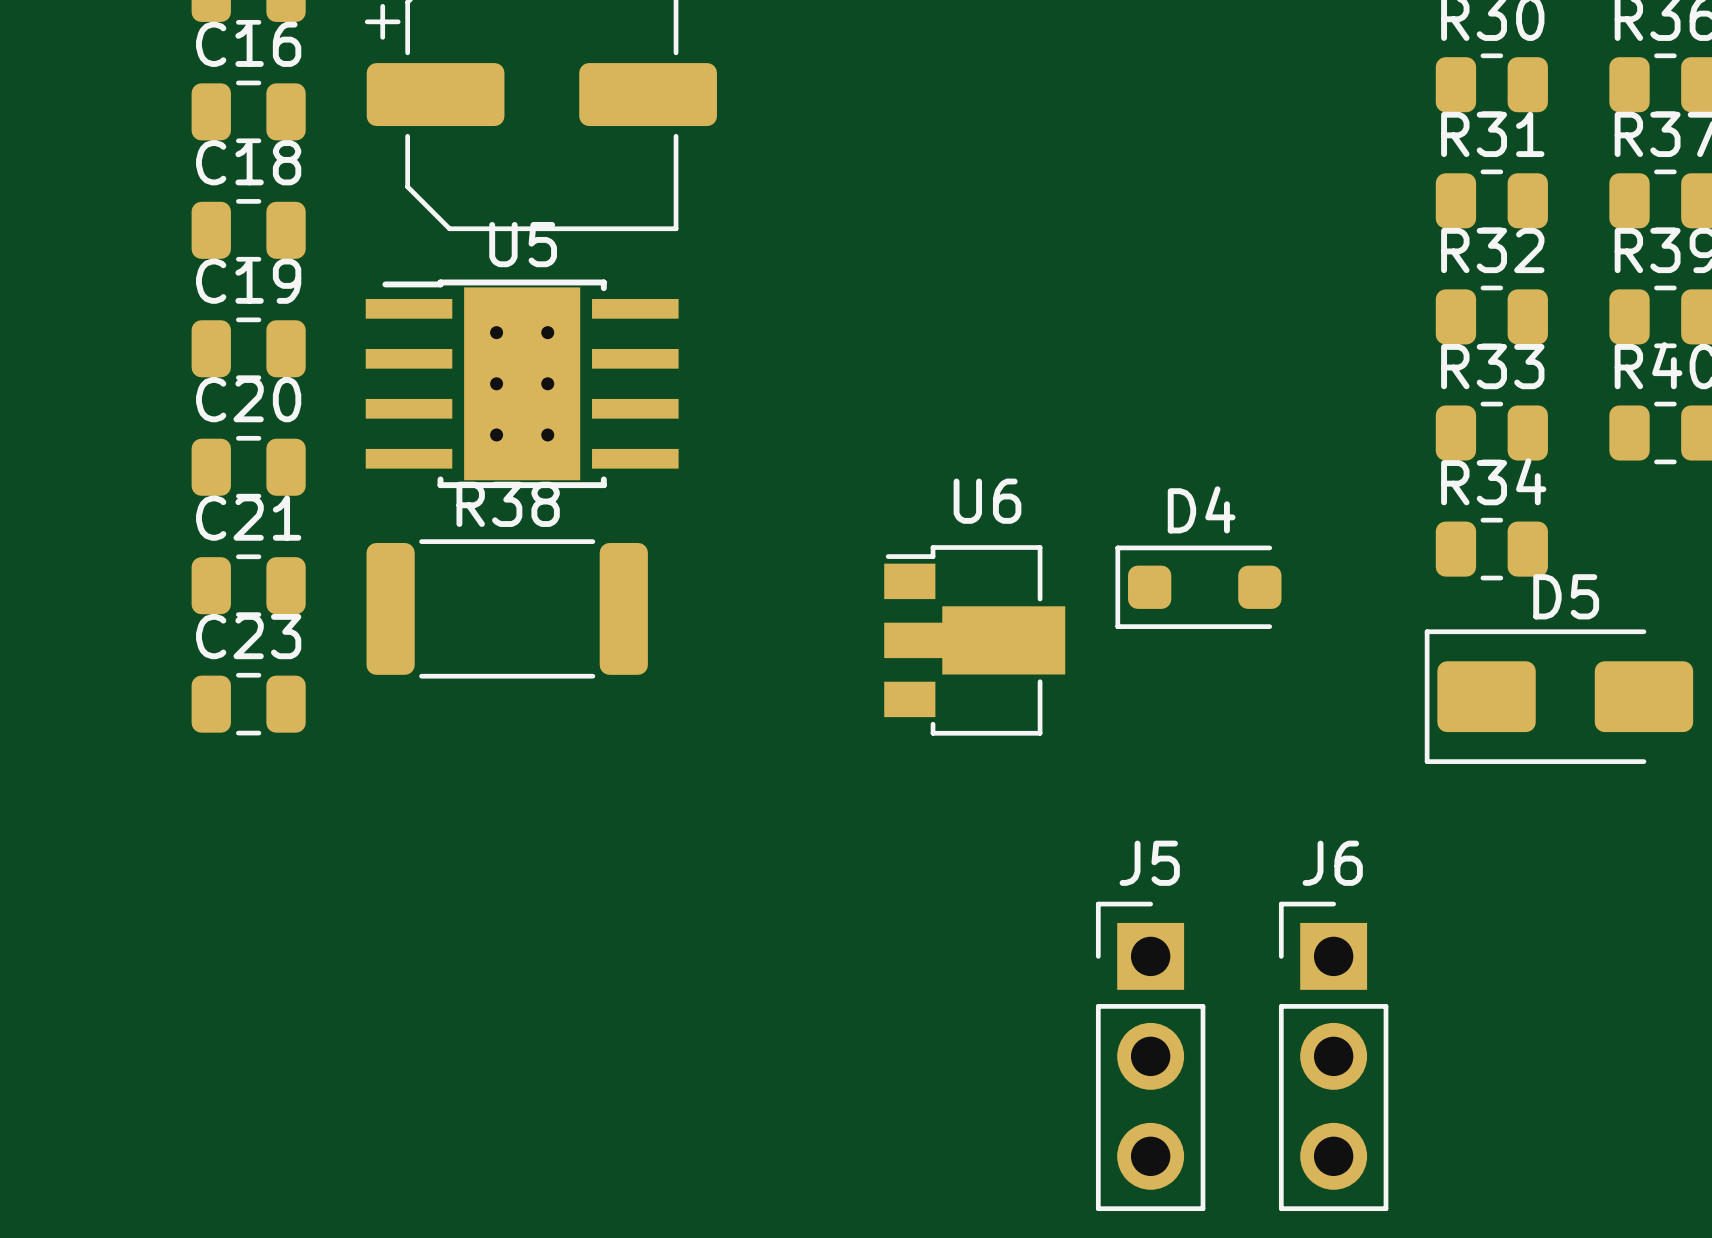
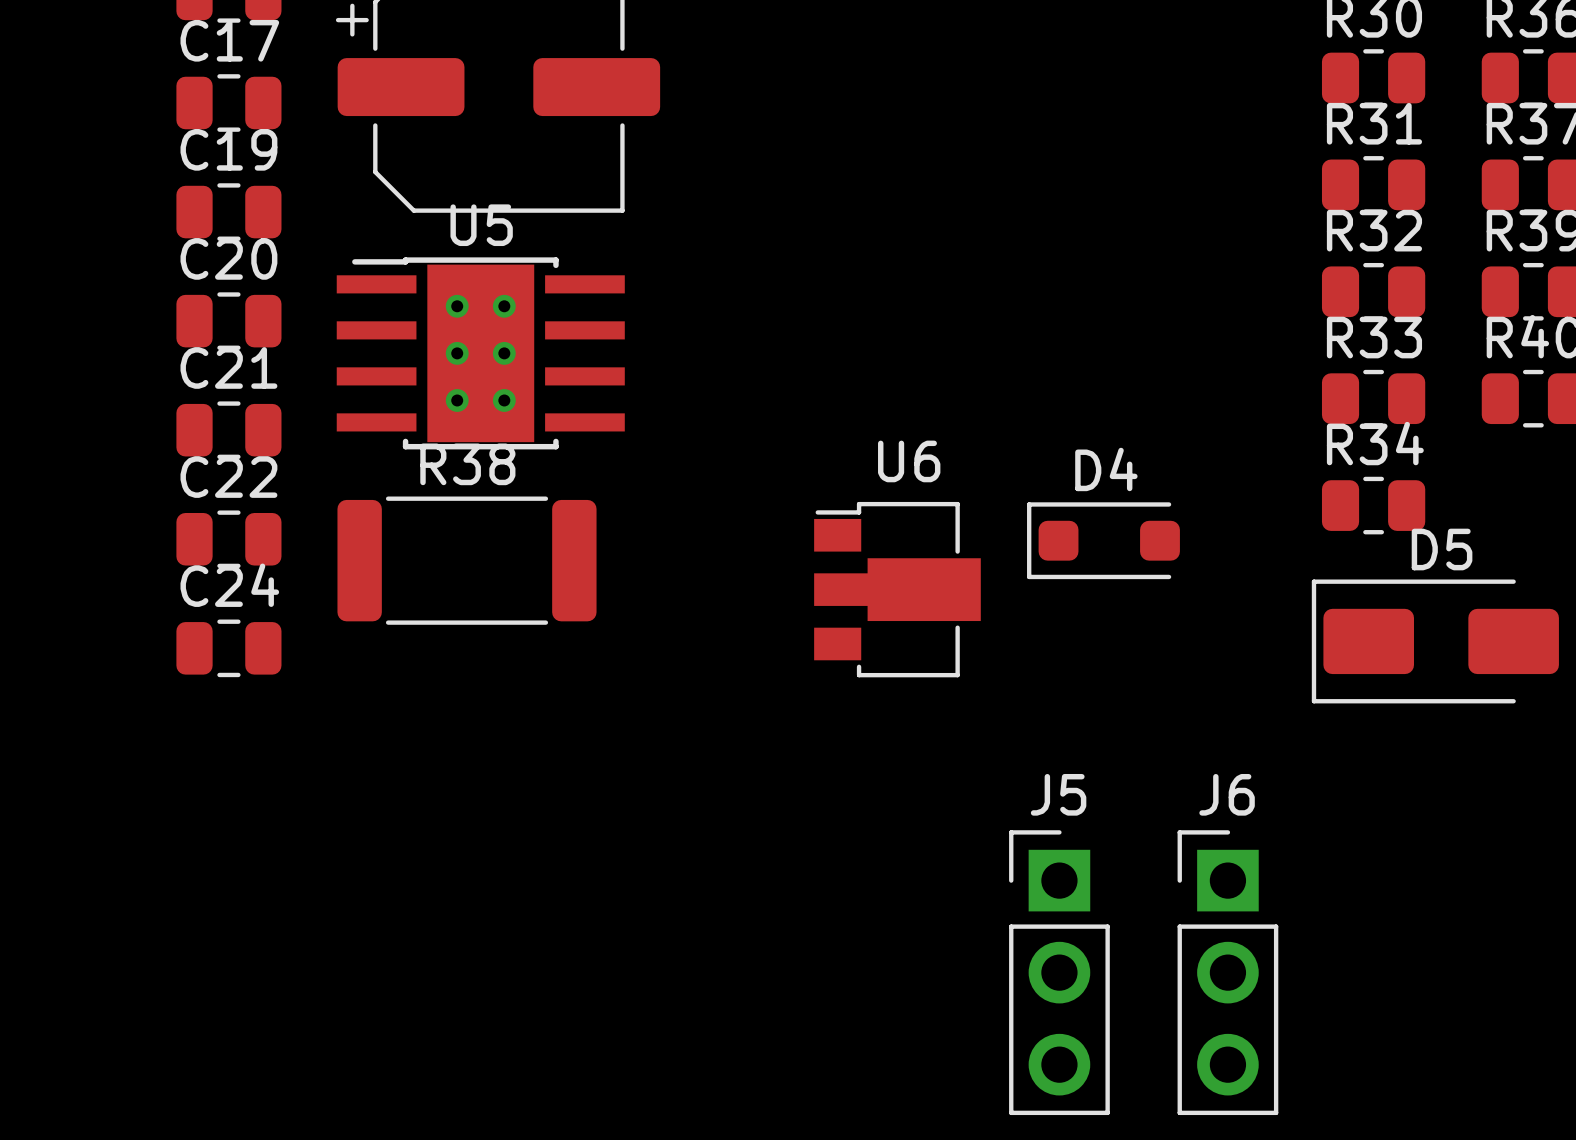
C16 name: C16 (248, 44) -> C17 (229, 40)
C18 name: C18 (248, 162) -> C19 (228, 149)
C19 name: C19 (248, 281) -> C20 (228, 258)
C20 name: C20 (248, 399) -> C21 (228, 367)
C21 name: C21 (248, 518) -> C22 (228, 477)
C23 name: C23 (248, 636) -> C24 (229, 585)

